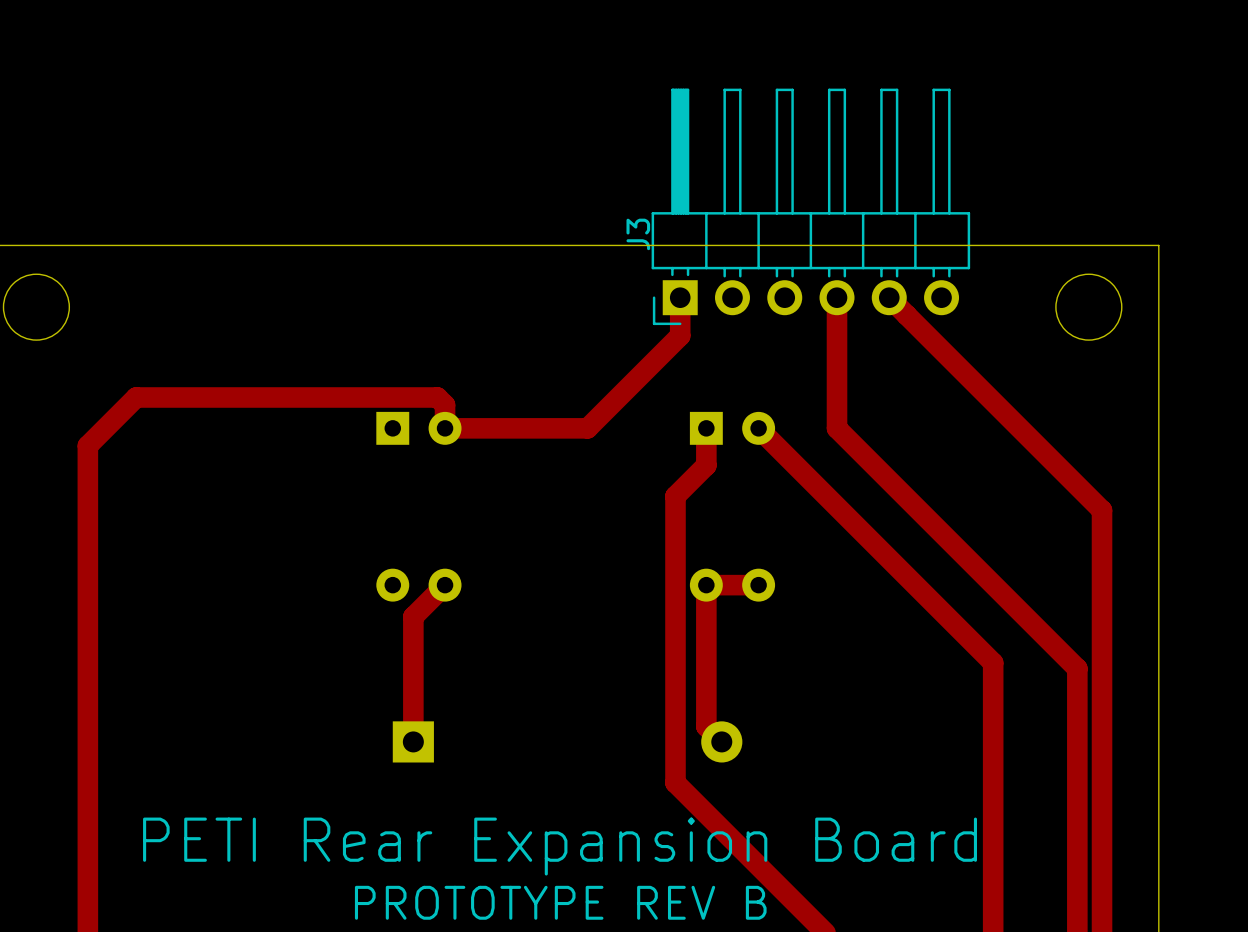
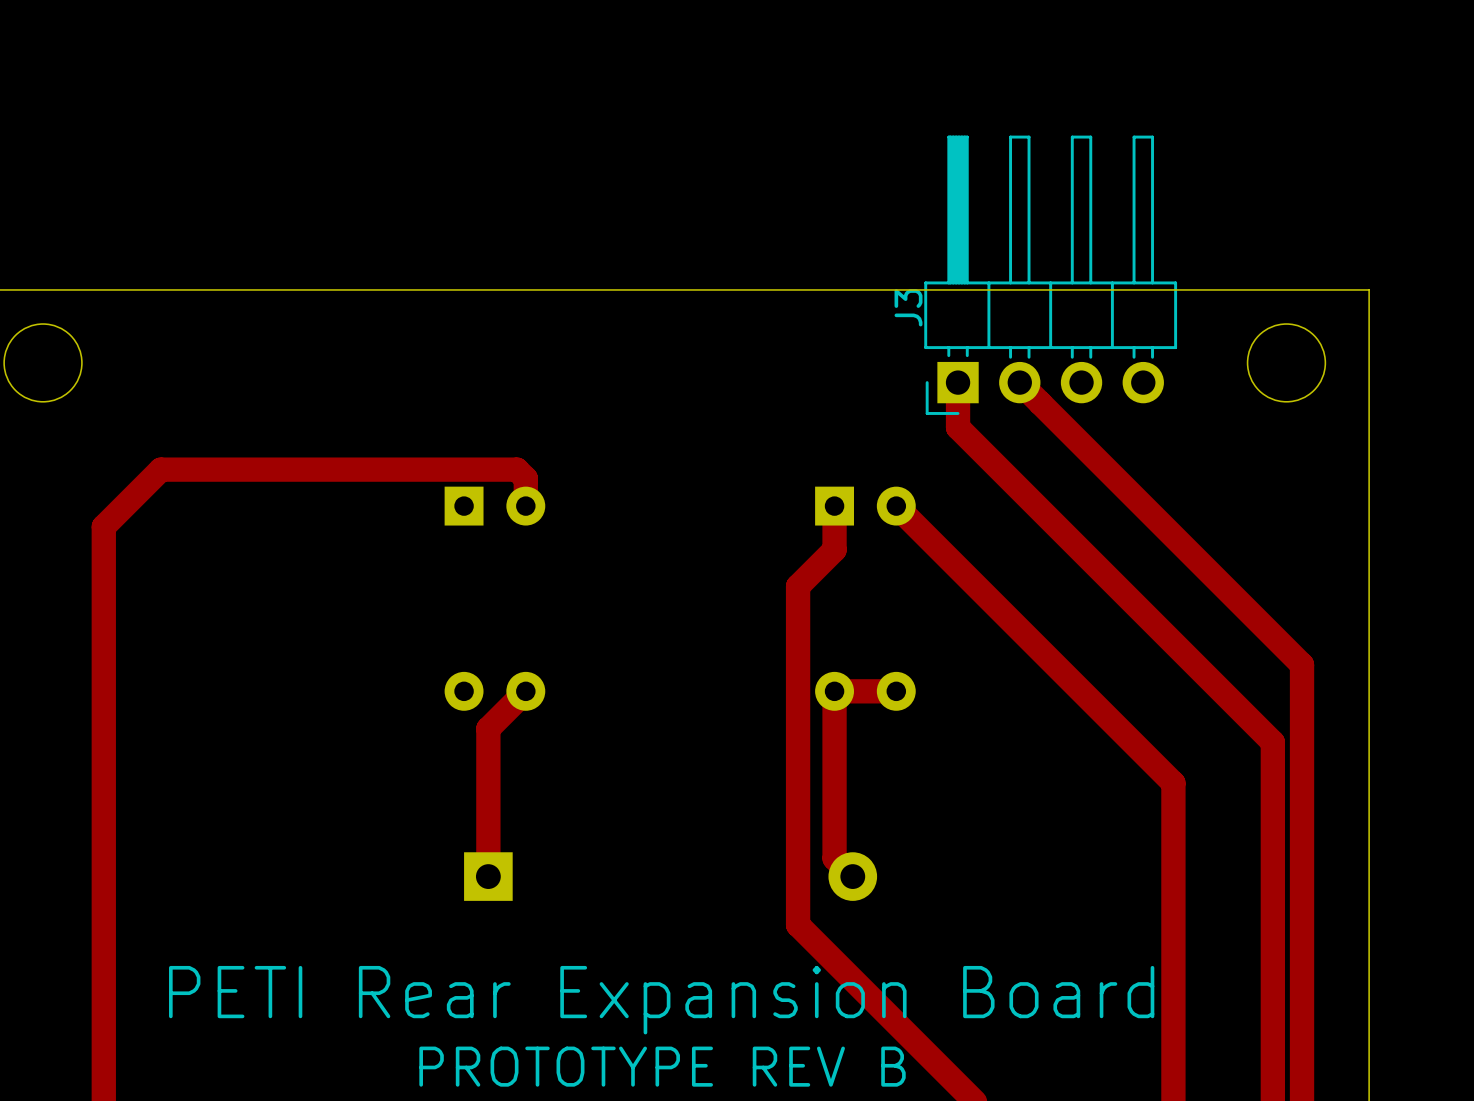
J3 footprint: [651, 88, 971, 326] -> [924, 135, 1178, 415]
J3 name position: J3 (638, 234) -> J3 (908, 307)
track: (680, 297) (680, 335) (587, 428) (445, 428) -> none
track: (837, 297) (837, 428) (1077, 668) -> (958, 382) (958, 427) (1272, 742) (1272, 790)
track: (889, 297) (1102, 510) (1102, 562) -> (1019, 382) (1302, 664)

